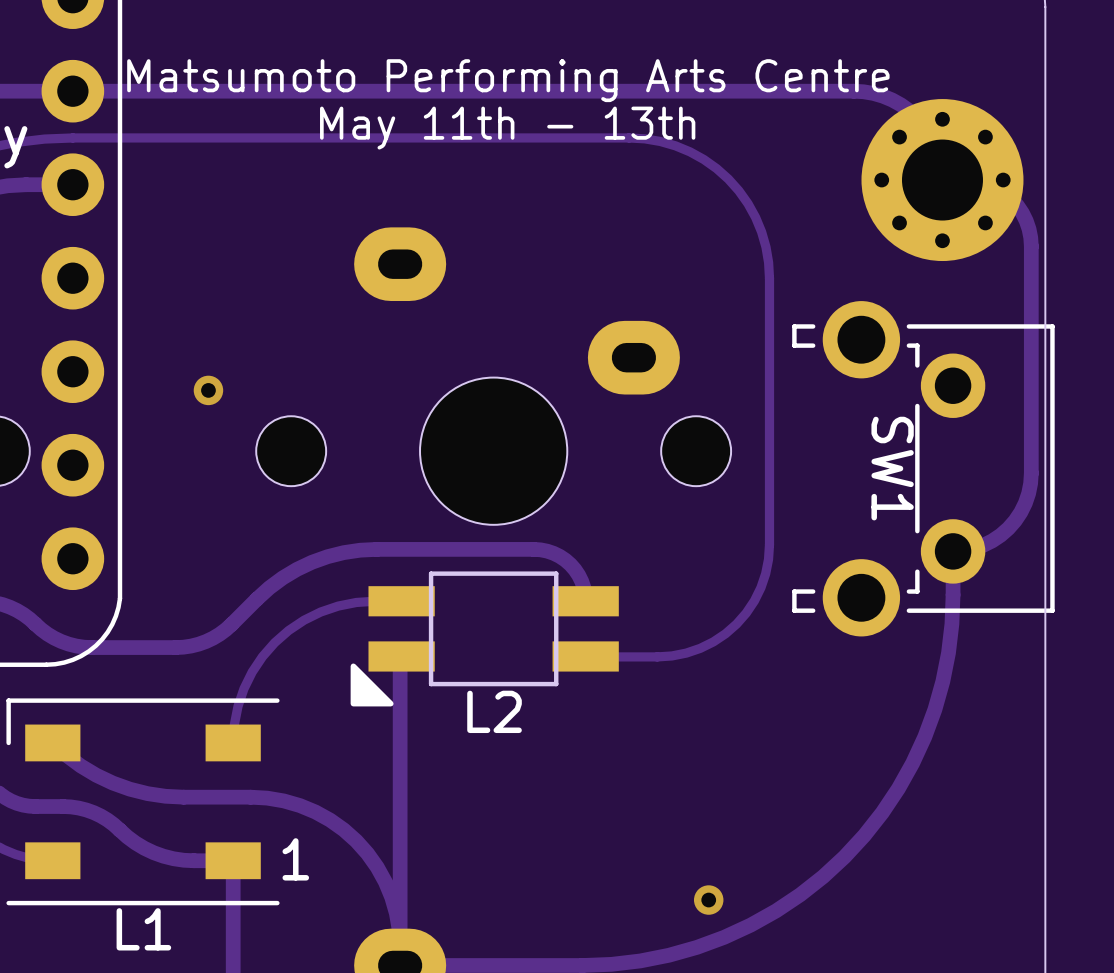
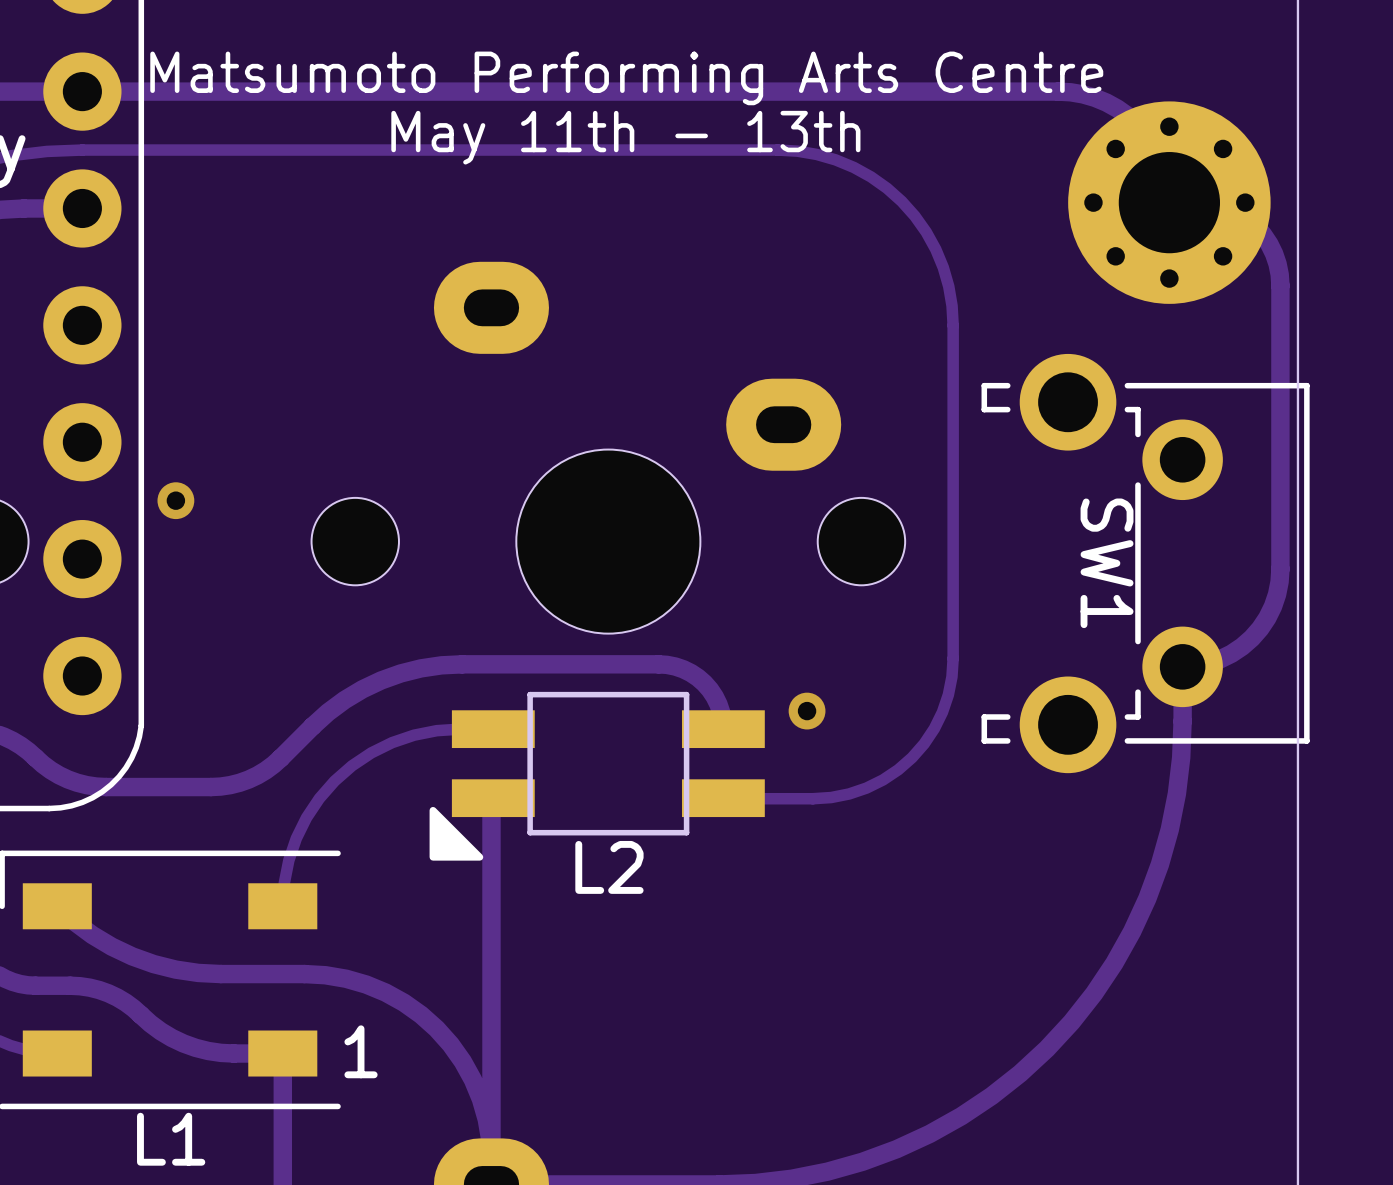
via position: (208, 390) -> (175, 500)
via: none -> (807, 711)
via: (708, 900) -> none

